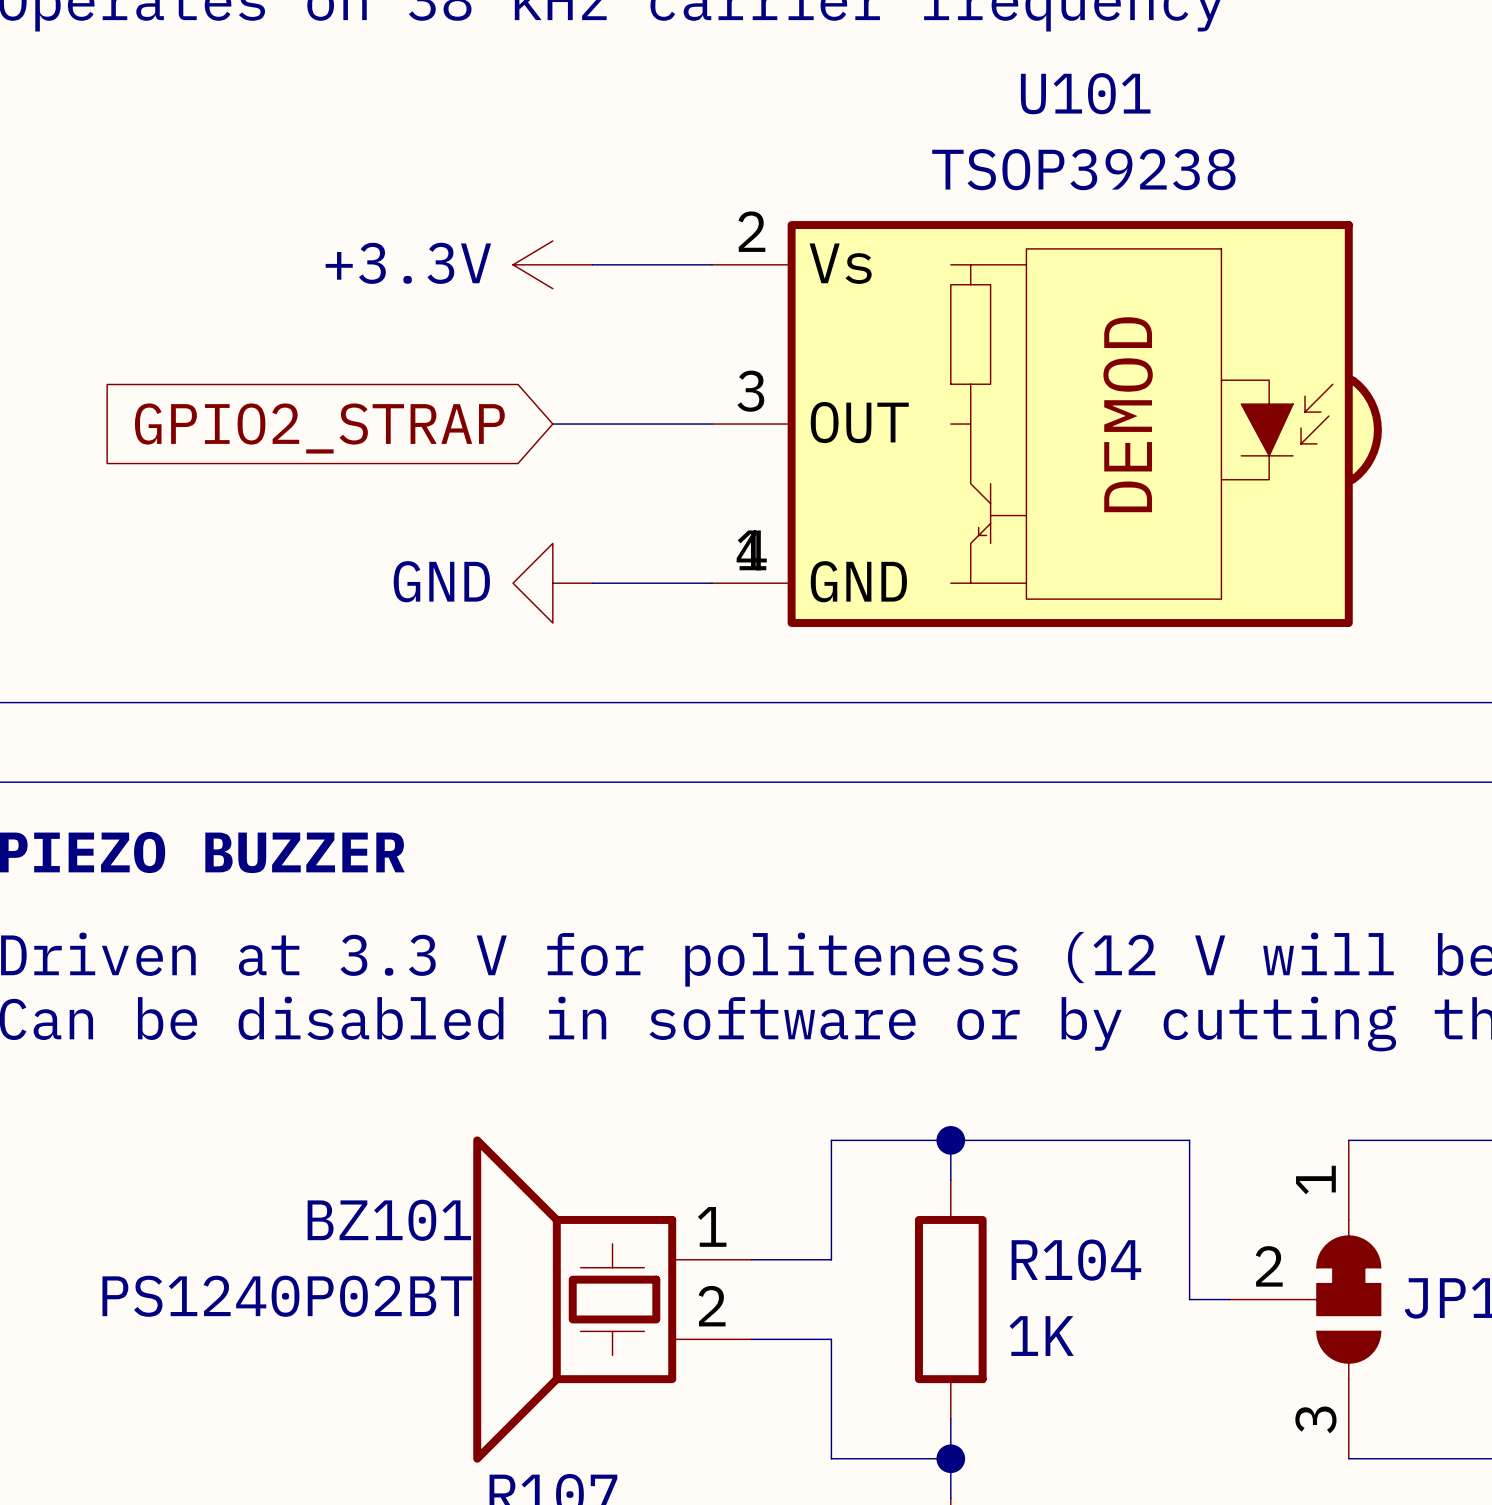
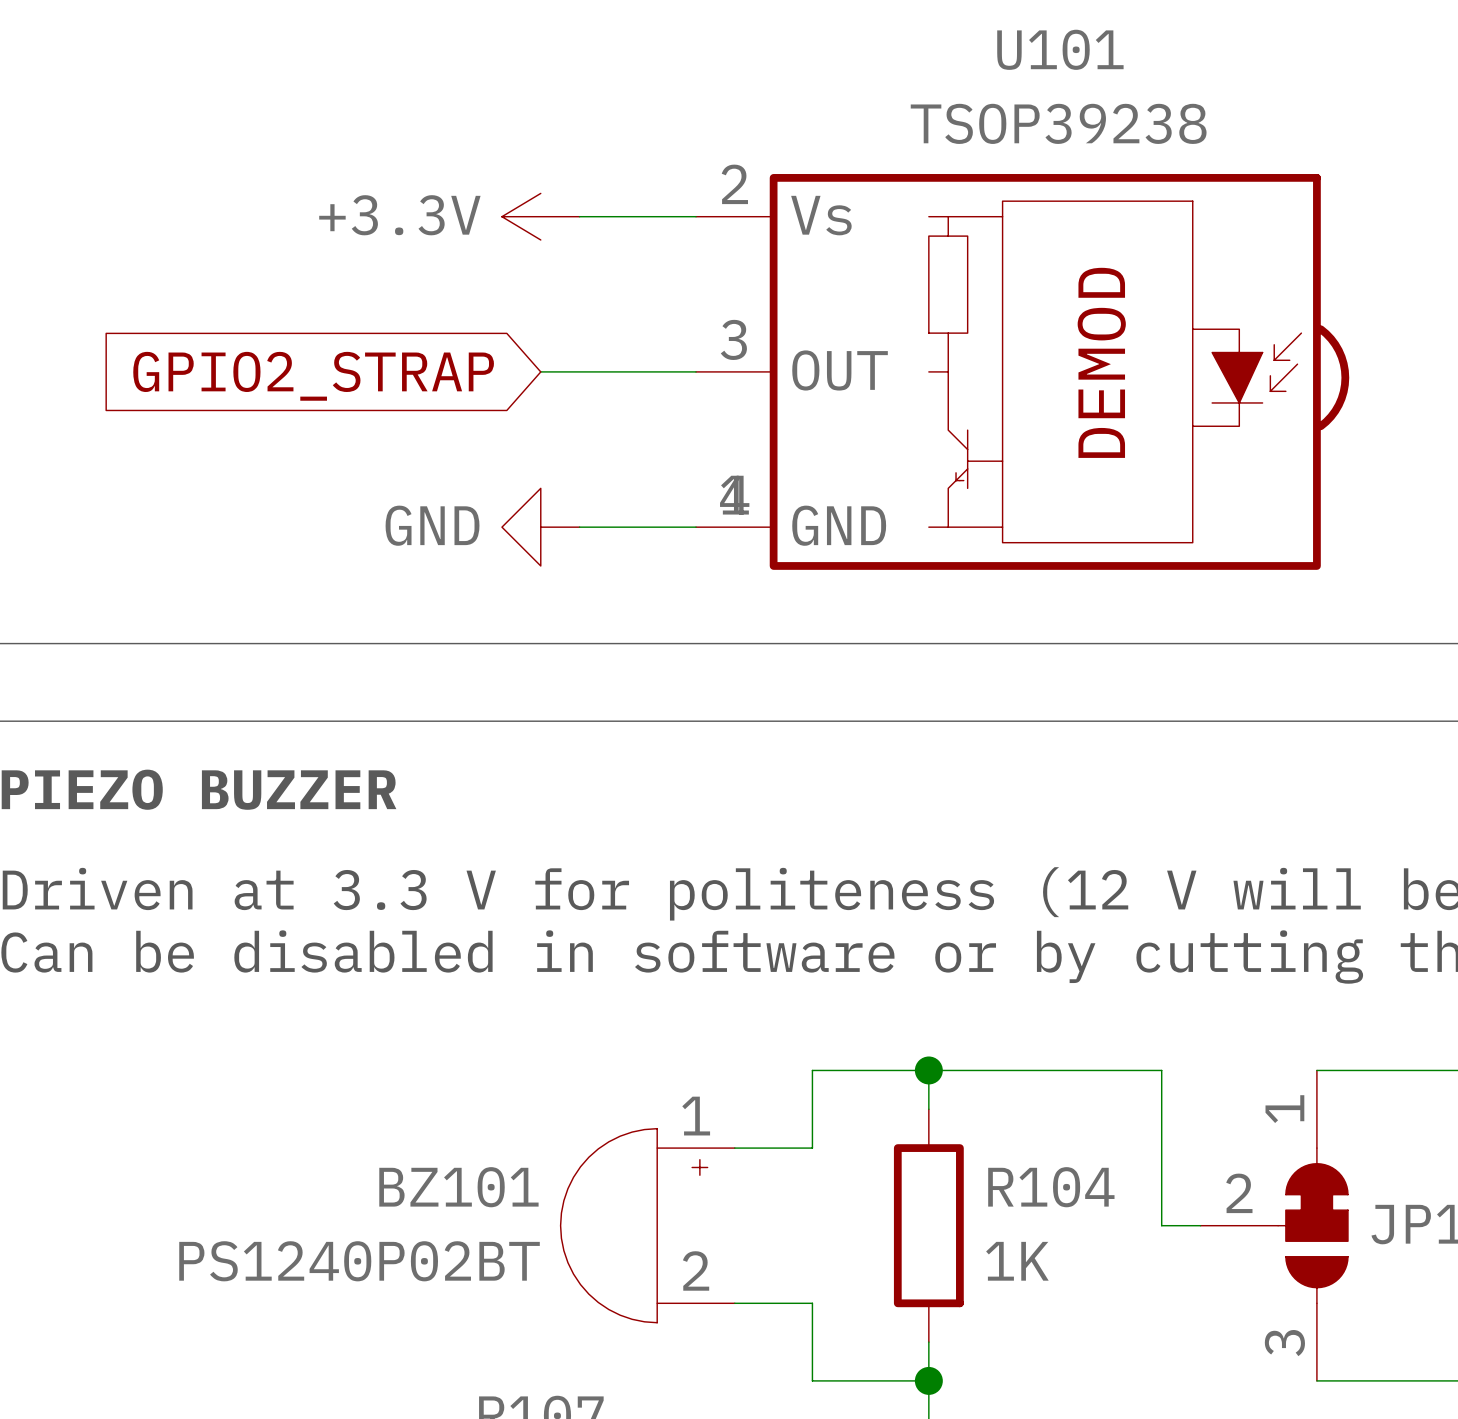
BZ101 symbol: [473, 1136, 752, 1463] -> [560, 1128, 735, 1323]
wire: (831, 1219) (831, 1259) (751, 1259) -> (812, 1148) (734, 1148)
wire: (751, 1339) (831, 1339) (831, 1379) -> (734, 1303) (812, 1303)

